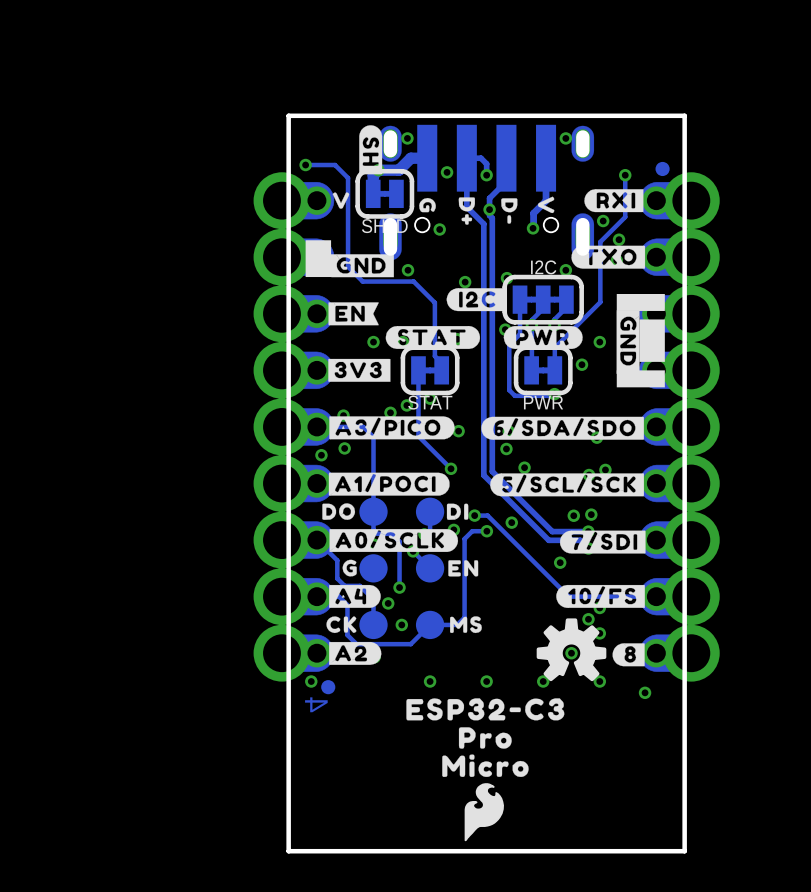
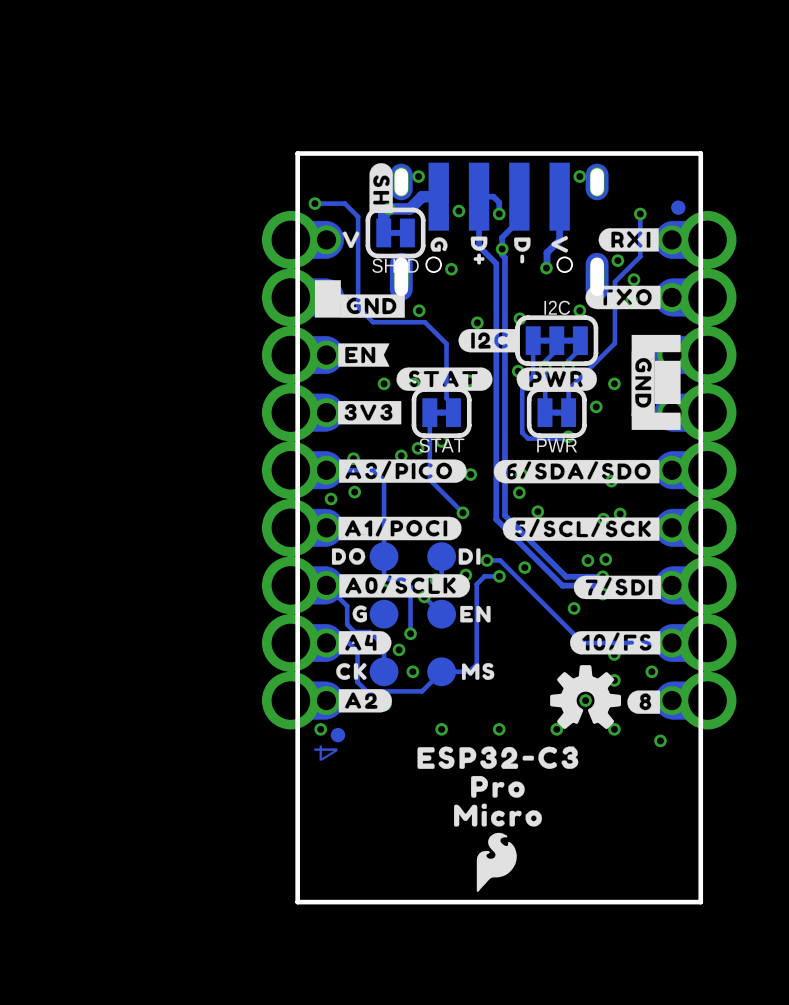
via position: (588, 619) -> (651, 671)

